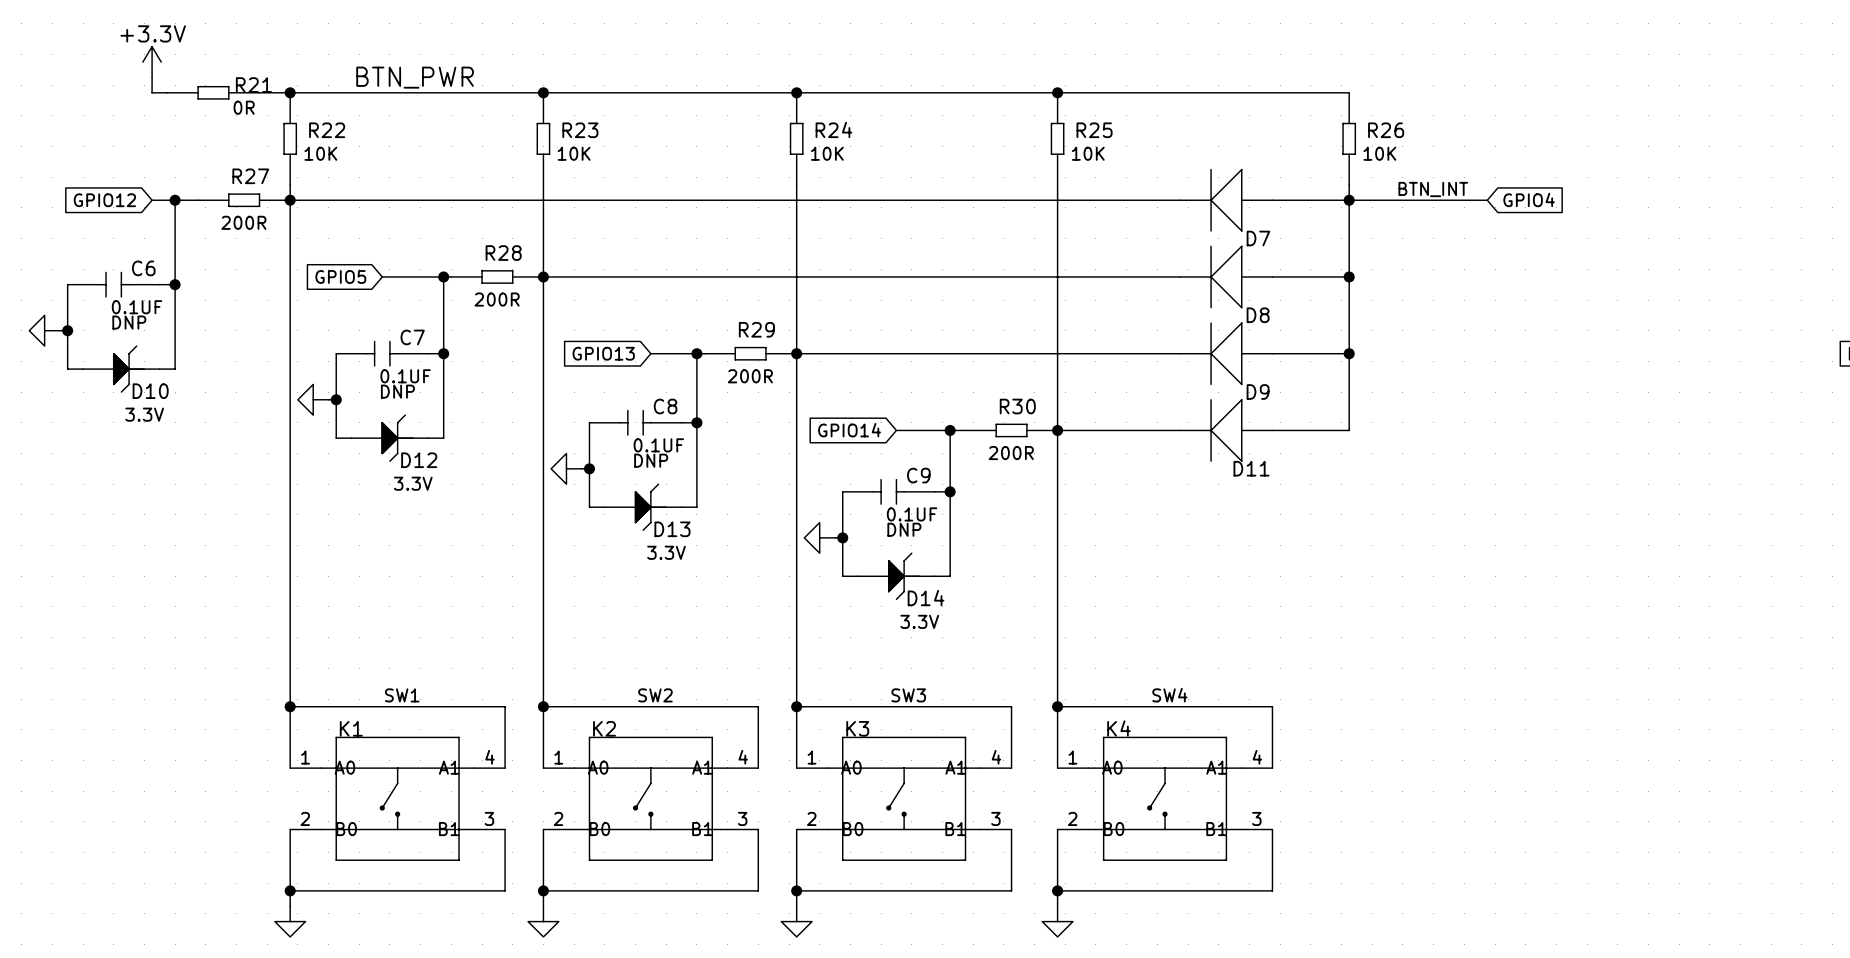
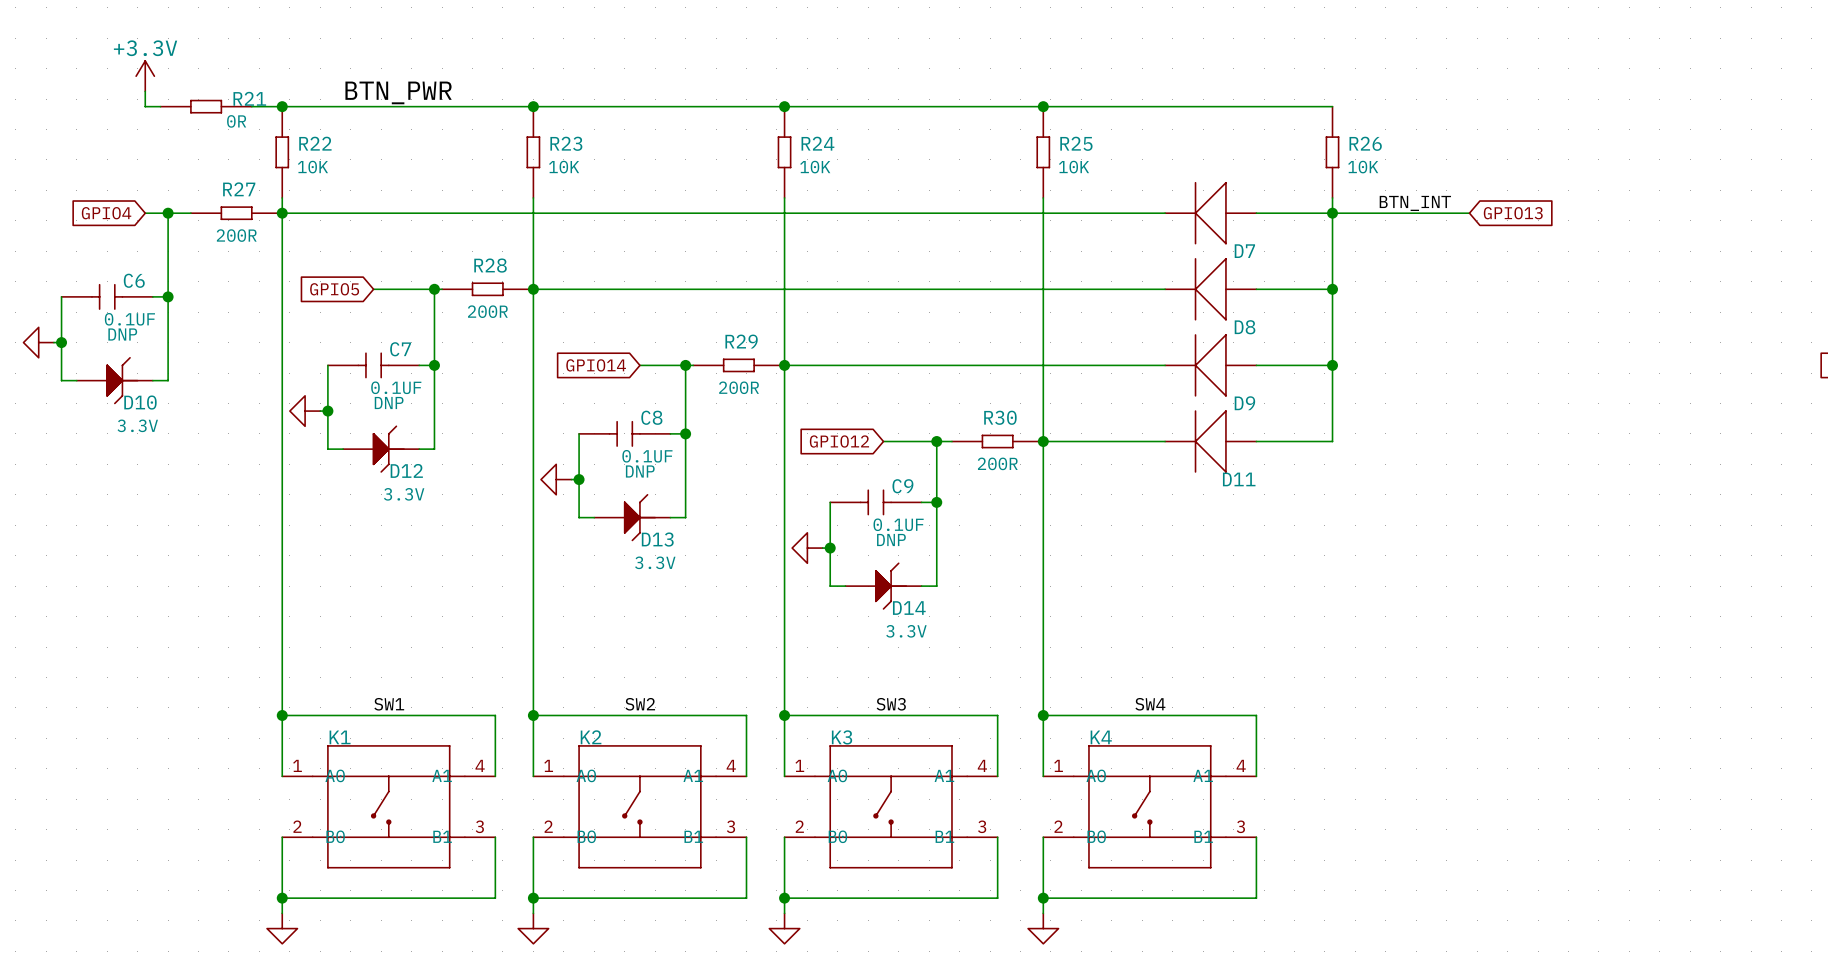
global label: GPIO4 (1529, 199) -> GPIO13 (1513, 213)
global label: GPIO12 (104, 200) -> GPIO4 (106, 213)
global label: GPIO13 (603, 353) -> GPIO14 (596, 365)
global label: GPIO14 (849, 430) -> GPIO12 (839, 441)

